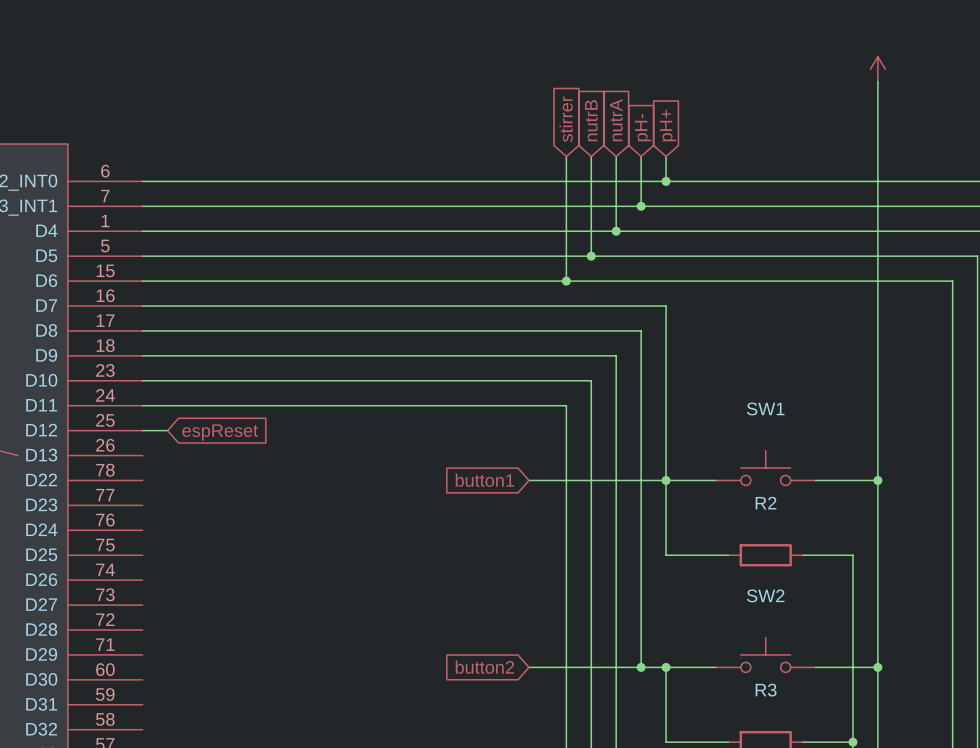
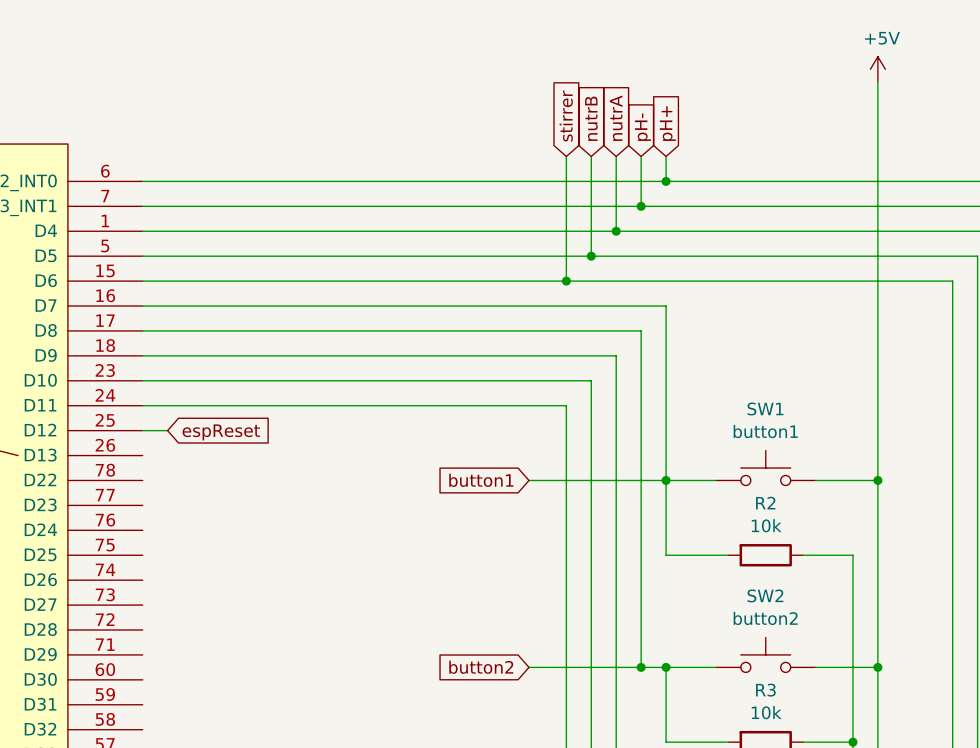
power symbol text: none -> +5V (882, 38)
SW1 value: none -> button1 (765, 431)
R2 value: none -> 10k (766, 525)
SW2 value: none -> button2 (765, 618)
R3 value: none -> 10k (766, 712)

